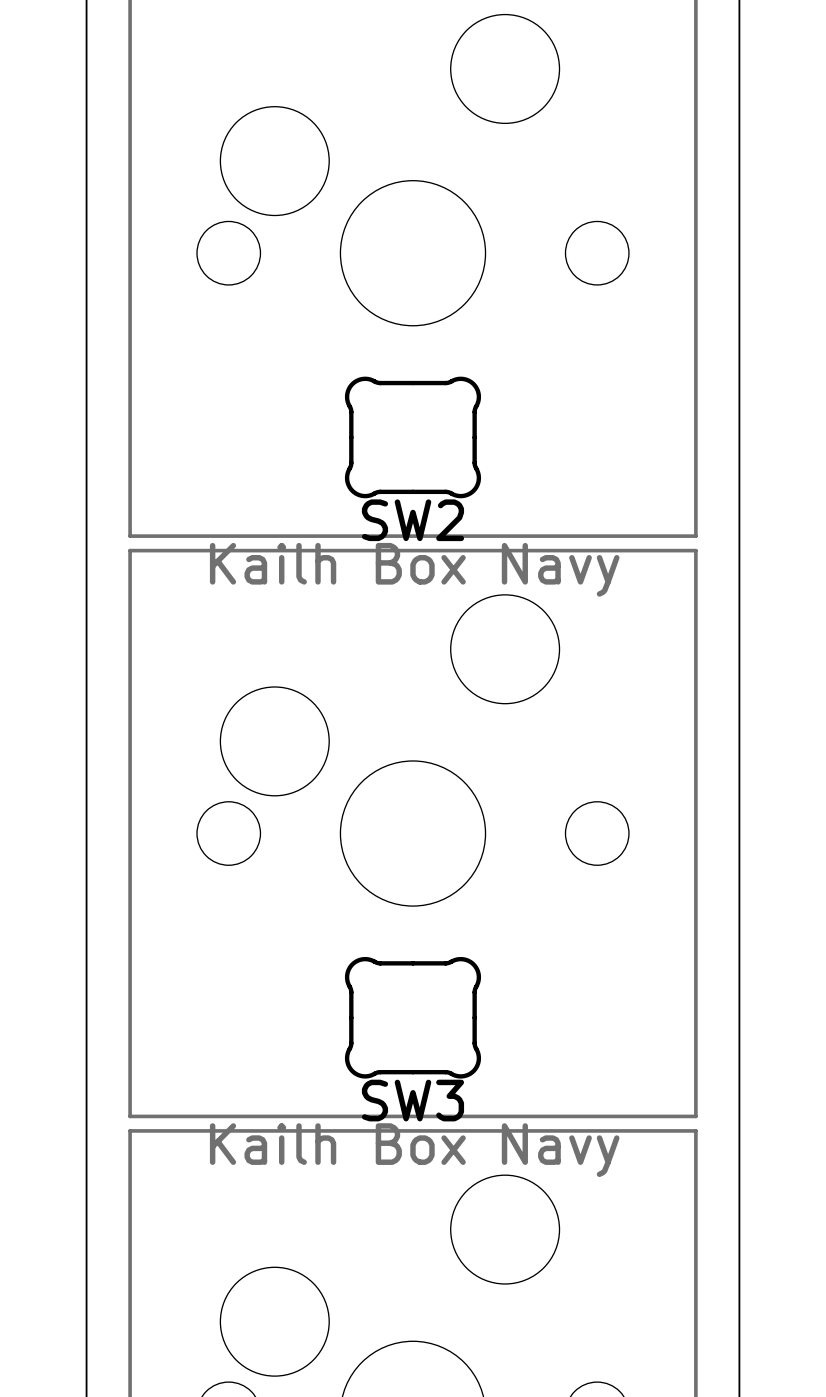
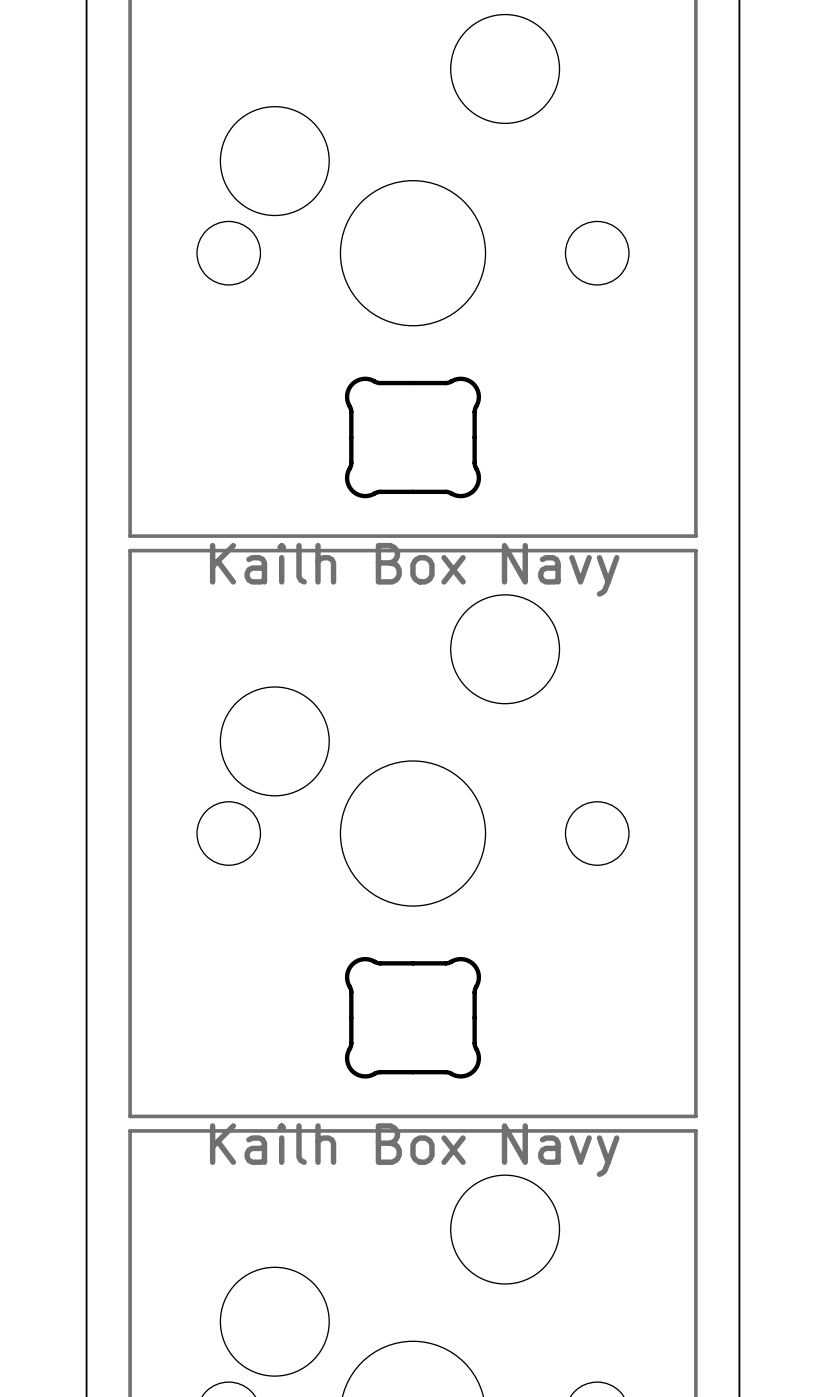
SW2 name: SW2 (412, 520) -> none
SW3 name: SW3 (412, 1100) -> none

